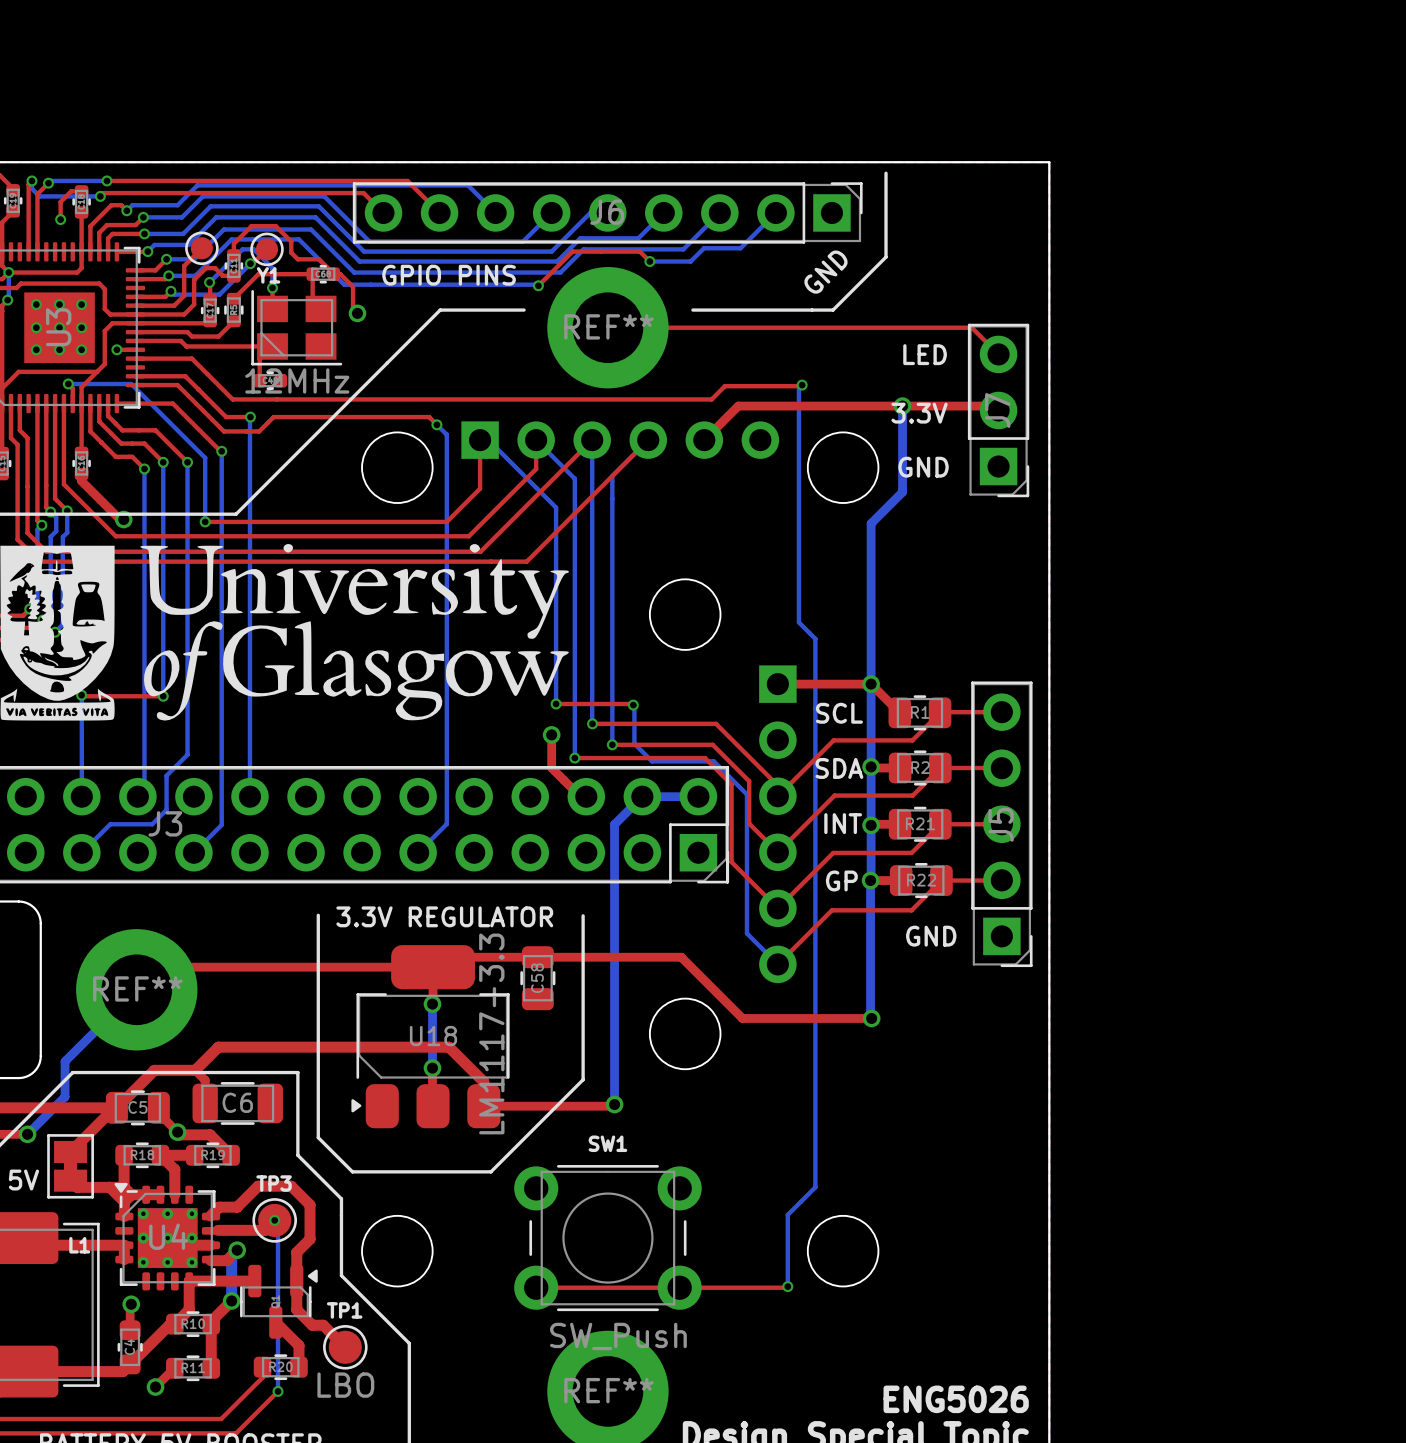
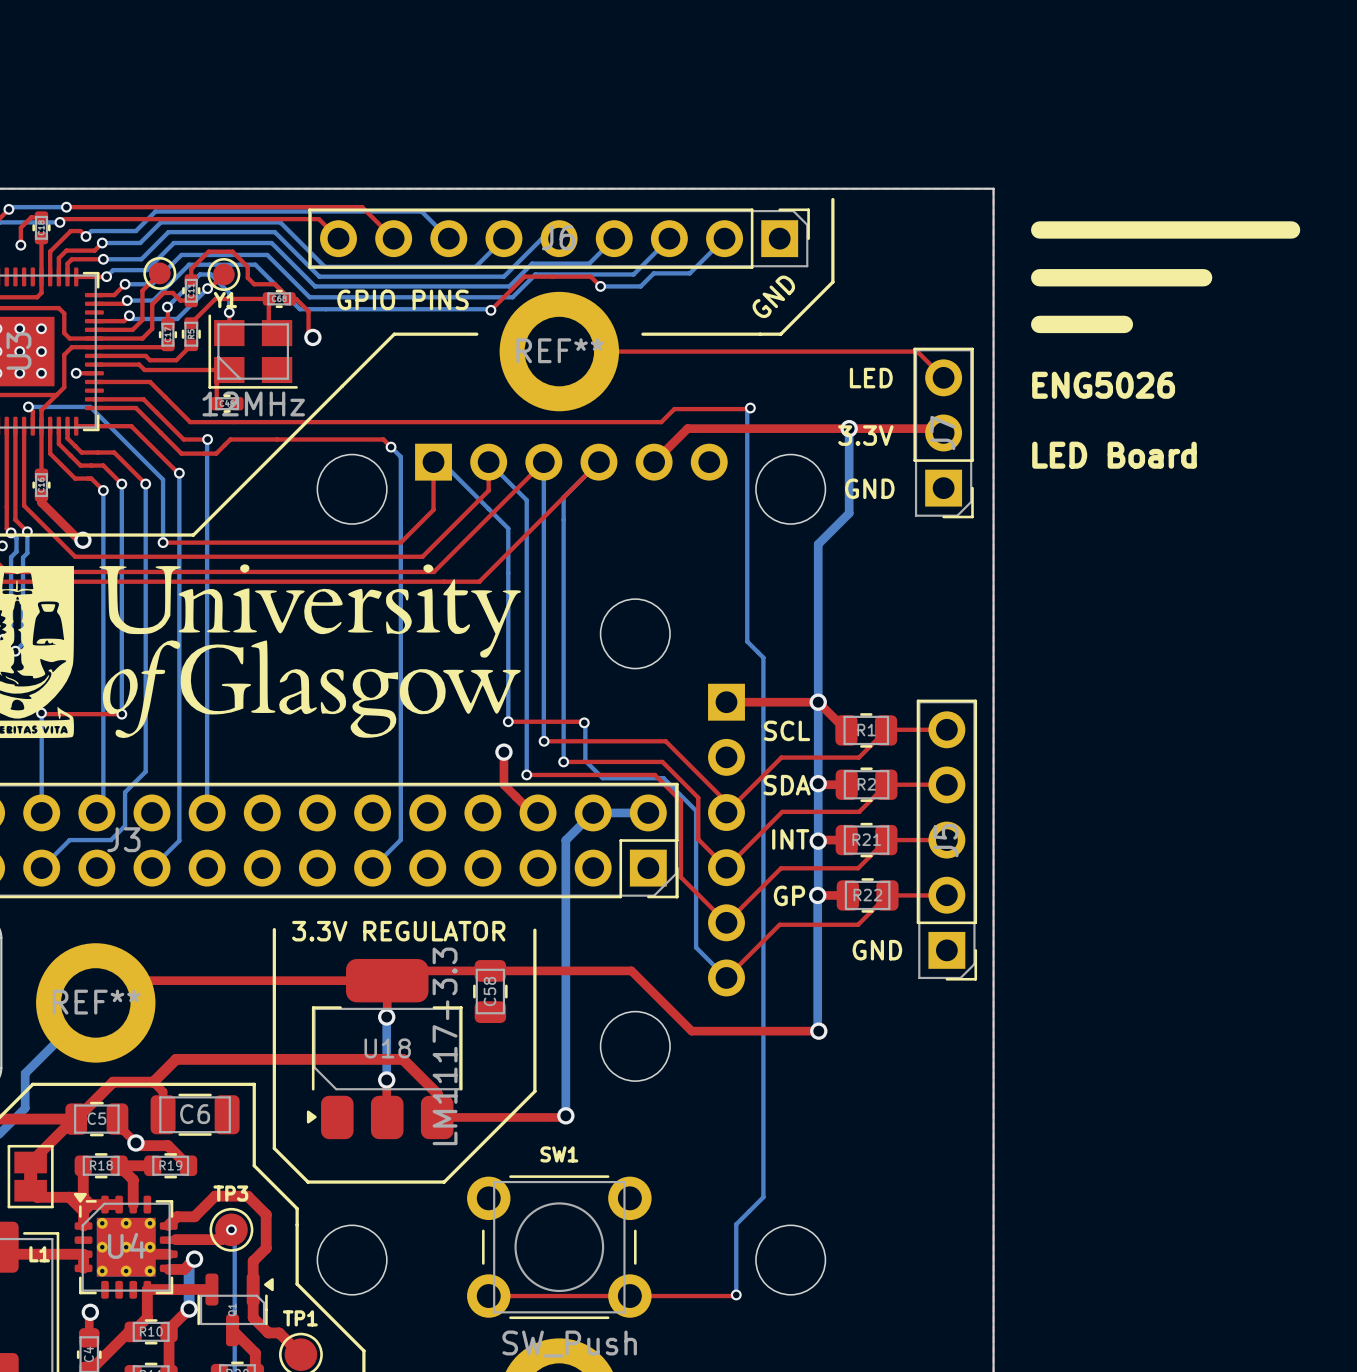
line: none -> (1039, 229) (1291, 229)
line: none -> (1039, 277) (1203, 277)
line: none -> (1039, 324) (1124, 324)
text: none -> ENG5026 (1103, 385)
text: none -> LED Board (1114, 455)

